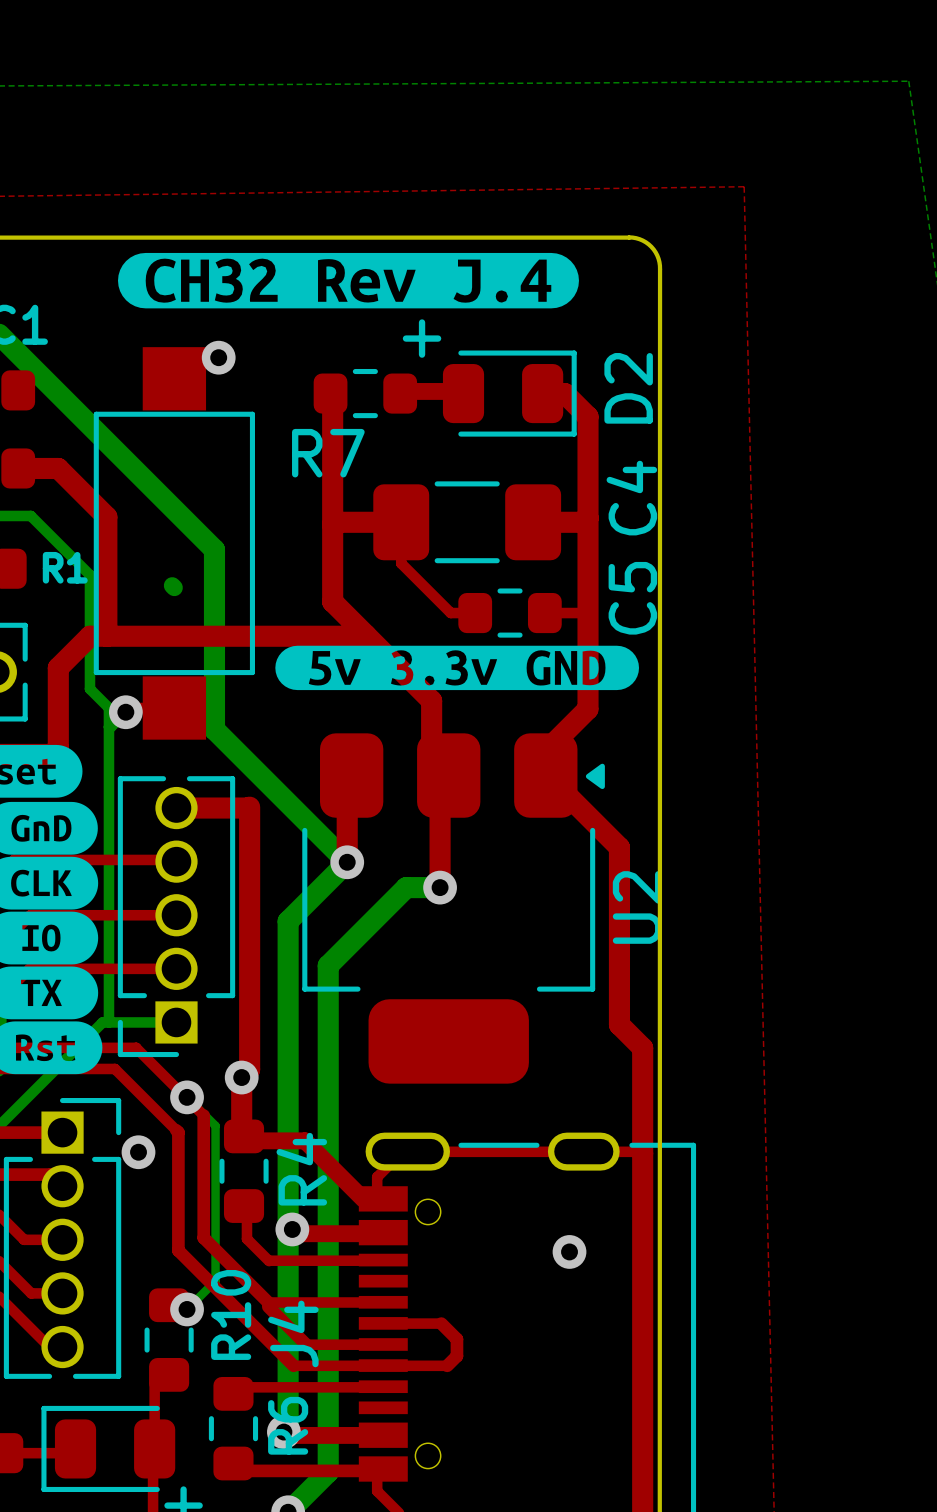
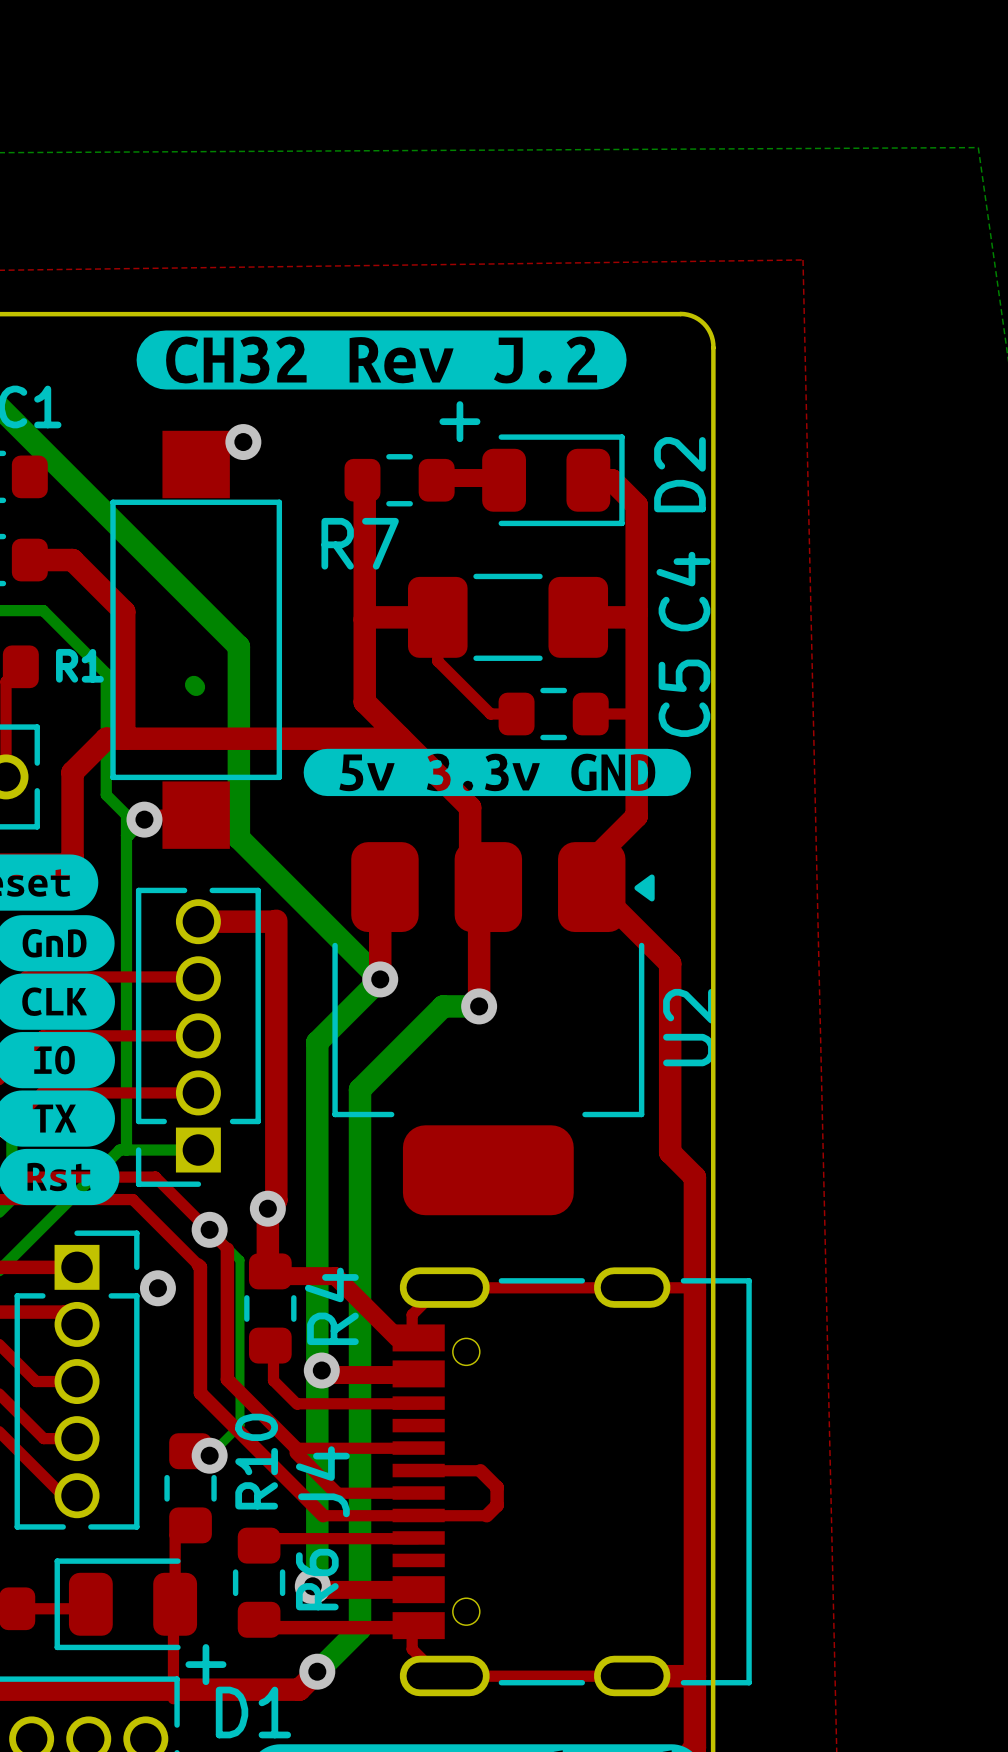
drawing shape: [117, 252, 579, 309] -> [136, 330, 627, 390]
via: (569, 1251) -> none

